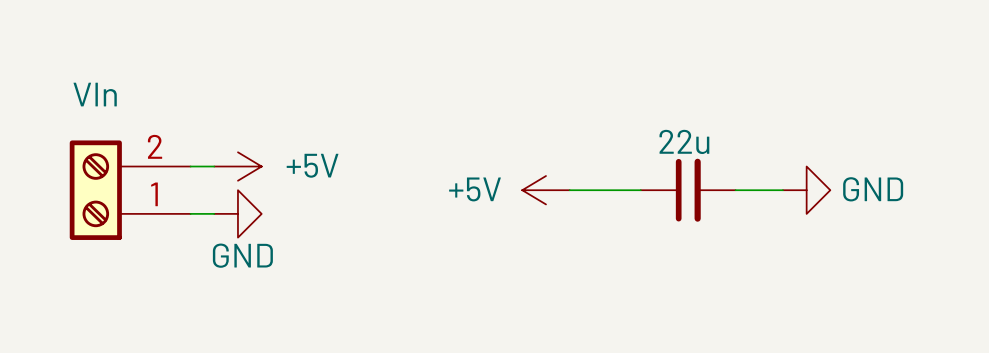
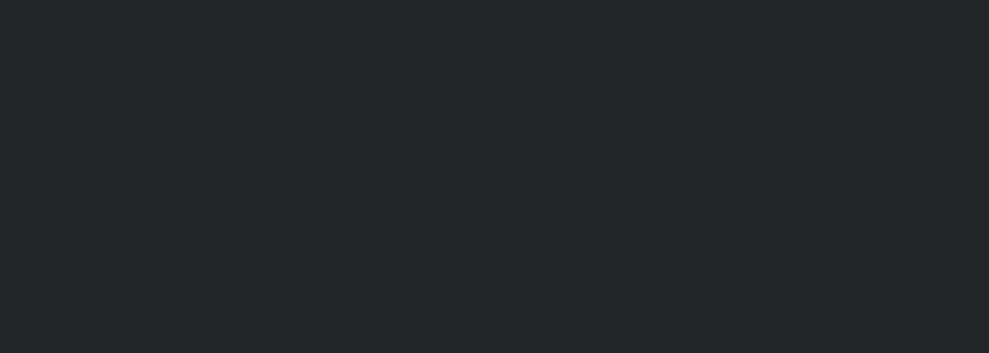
wire: (190, 166) (214, 166) -> none
power symbol: +5V (237, 166) -> none
part: VIn (130, 190) -> none
power symbol: +5V (546, 190) -> none
wire: (569, 190) (640, 190) -> none
part: 22u (688, 190) -> none
wire: (735, 190) (782, 190) -> none
power symbol: GND (806, 190) -> none
wire: (190, 213) (214, 213) -> none
power symbol: GND (237, 213) -> none

